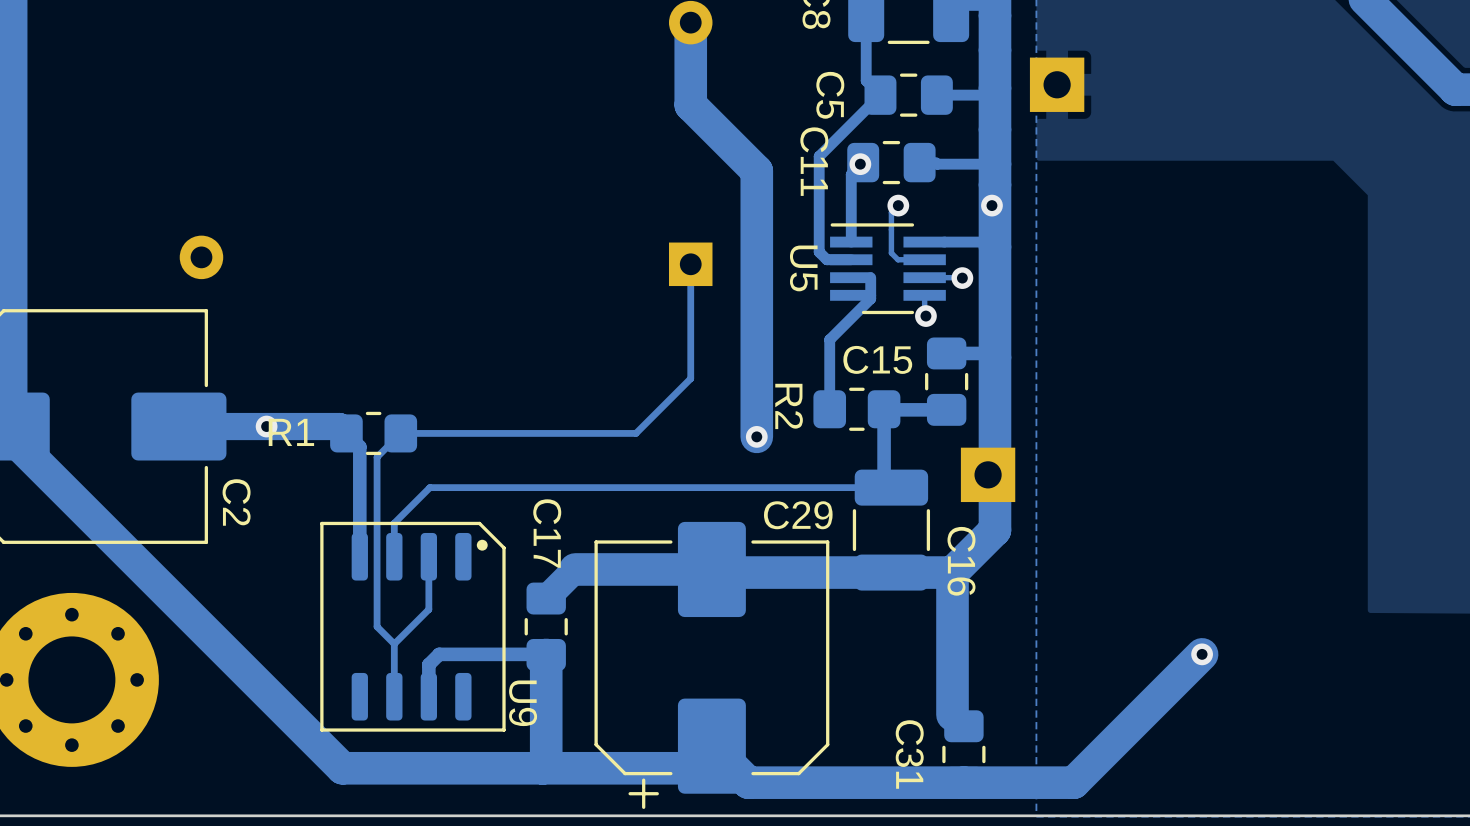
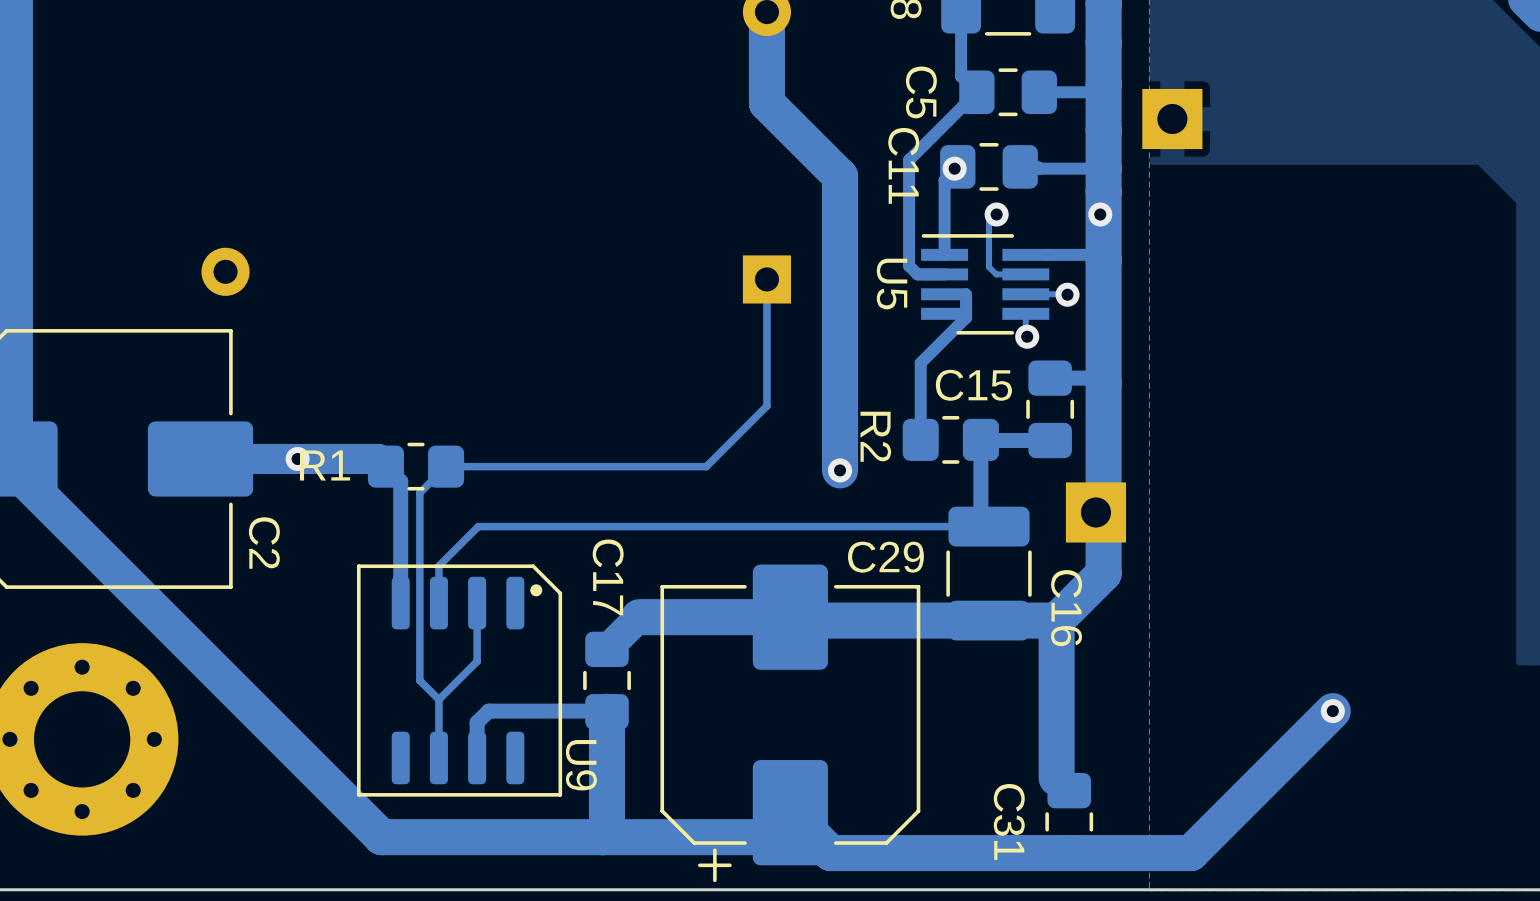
part position: (1057, 84) -> (1172, 119)

